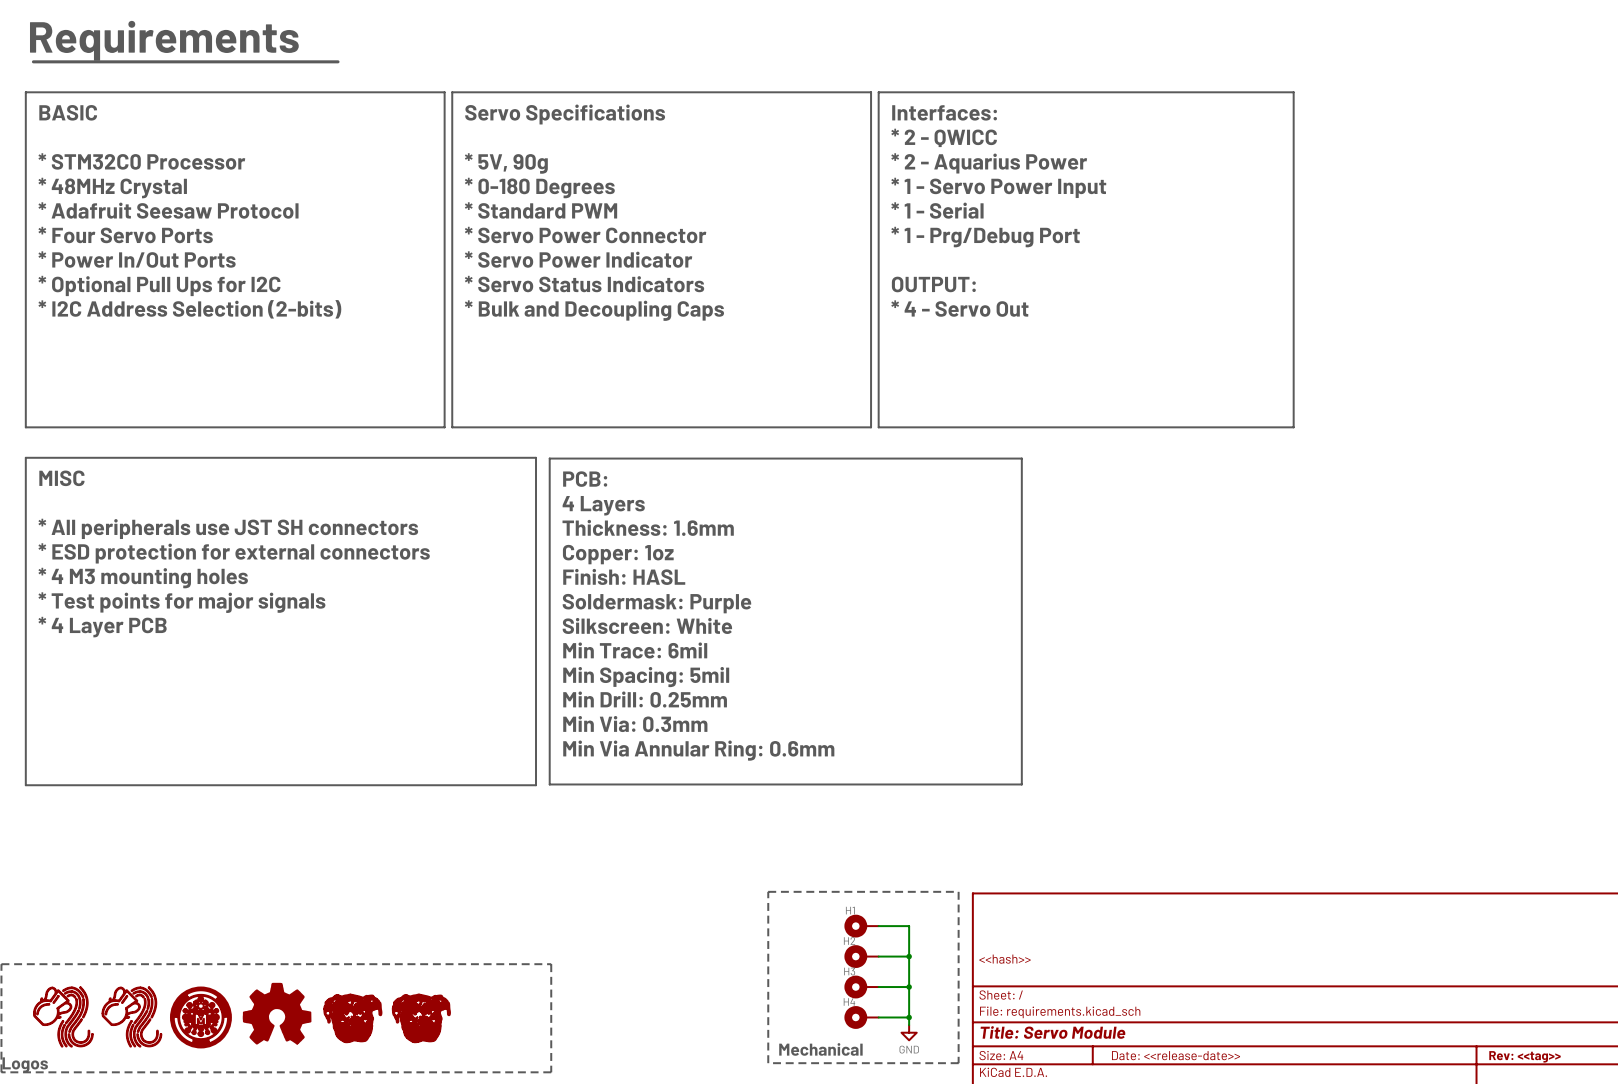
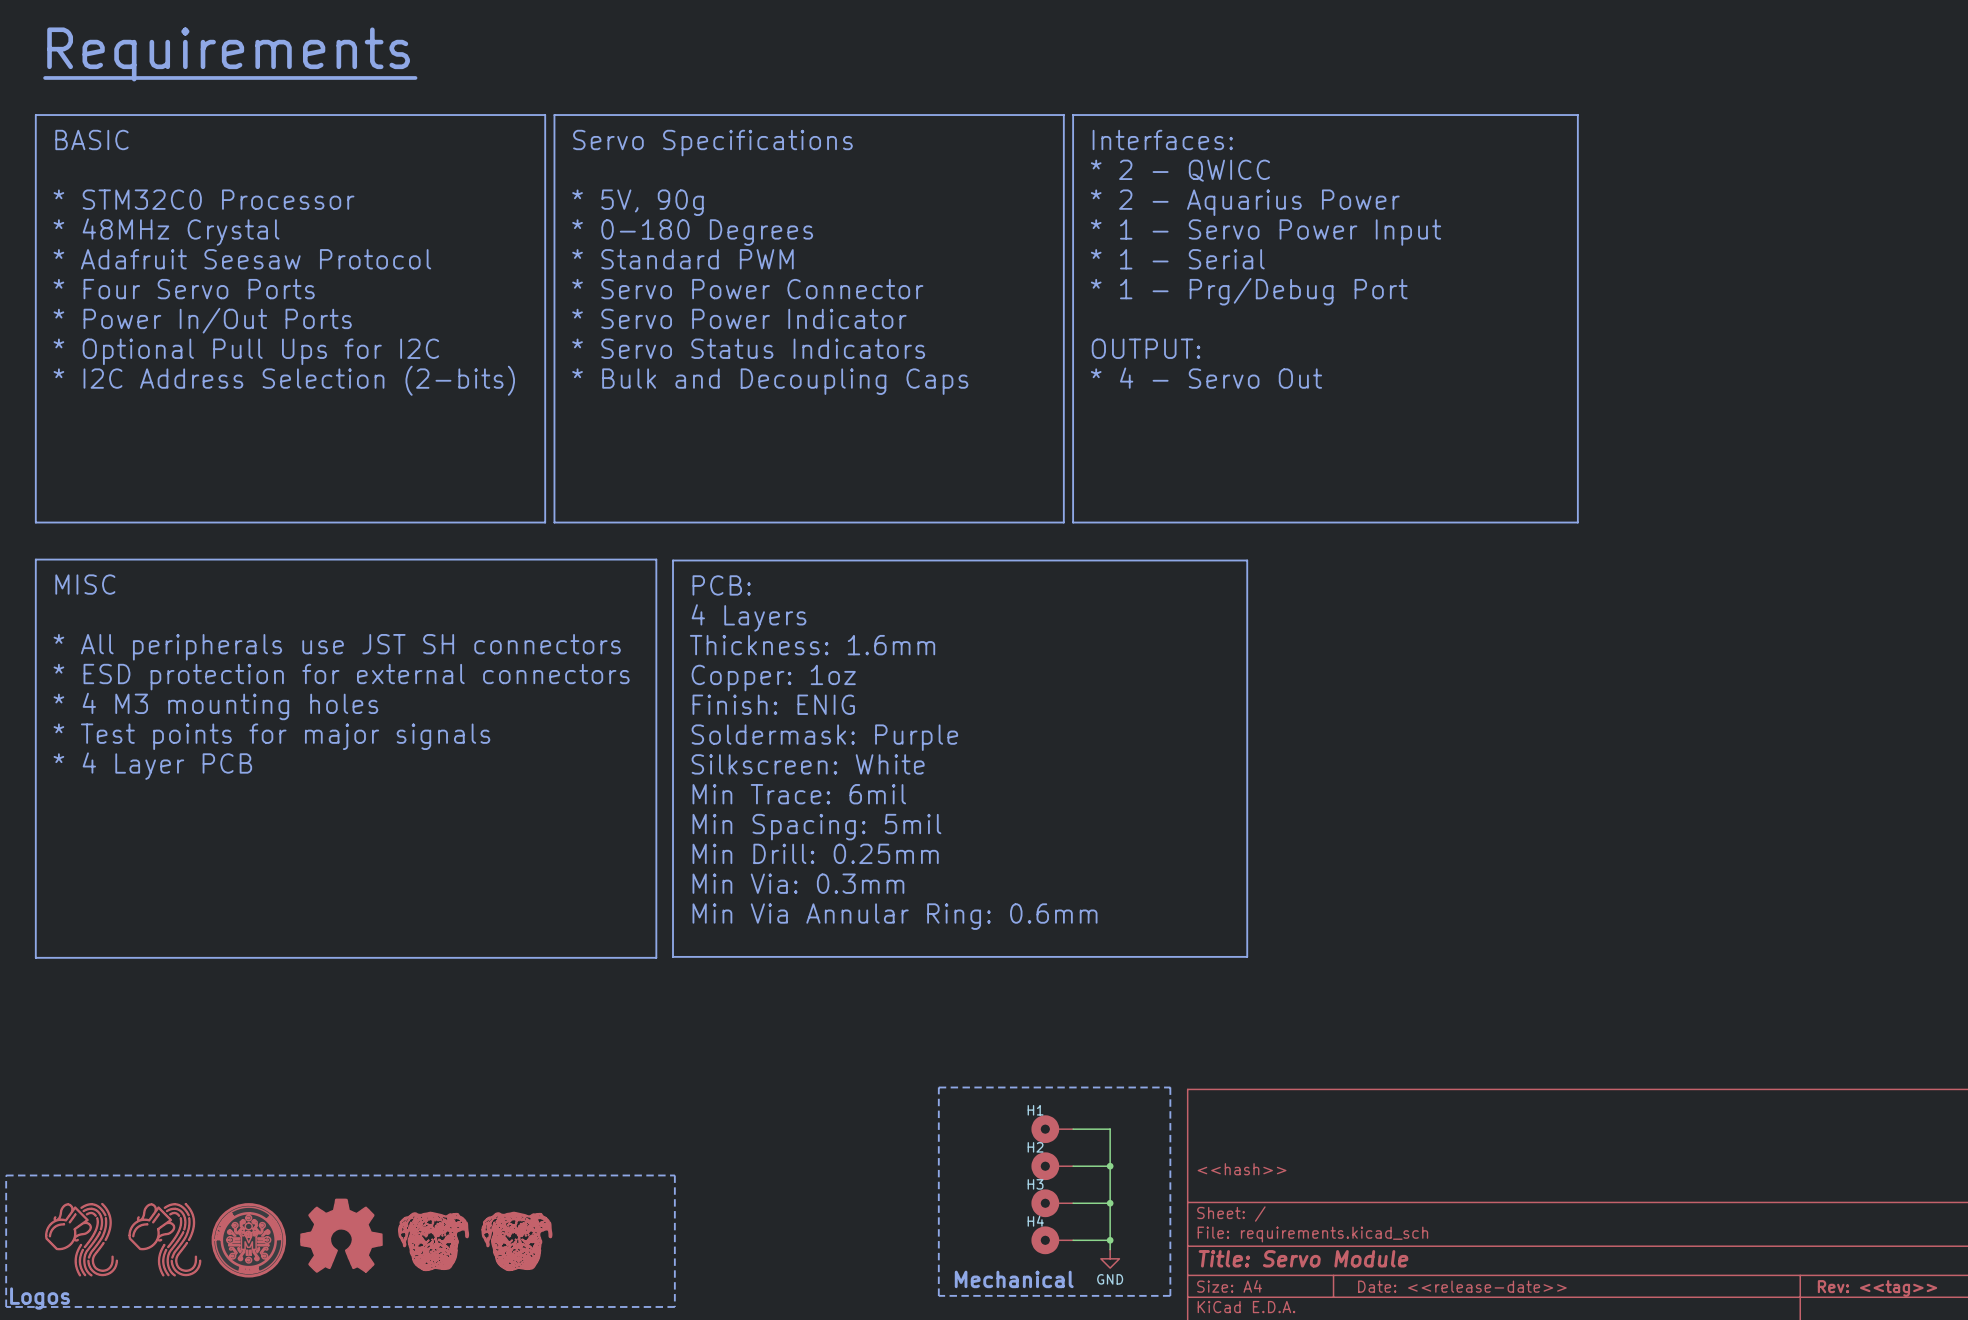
text: Finish: HASL (624, 576) -> Finish: ENIG (773, 704)

